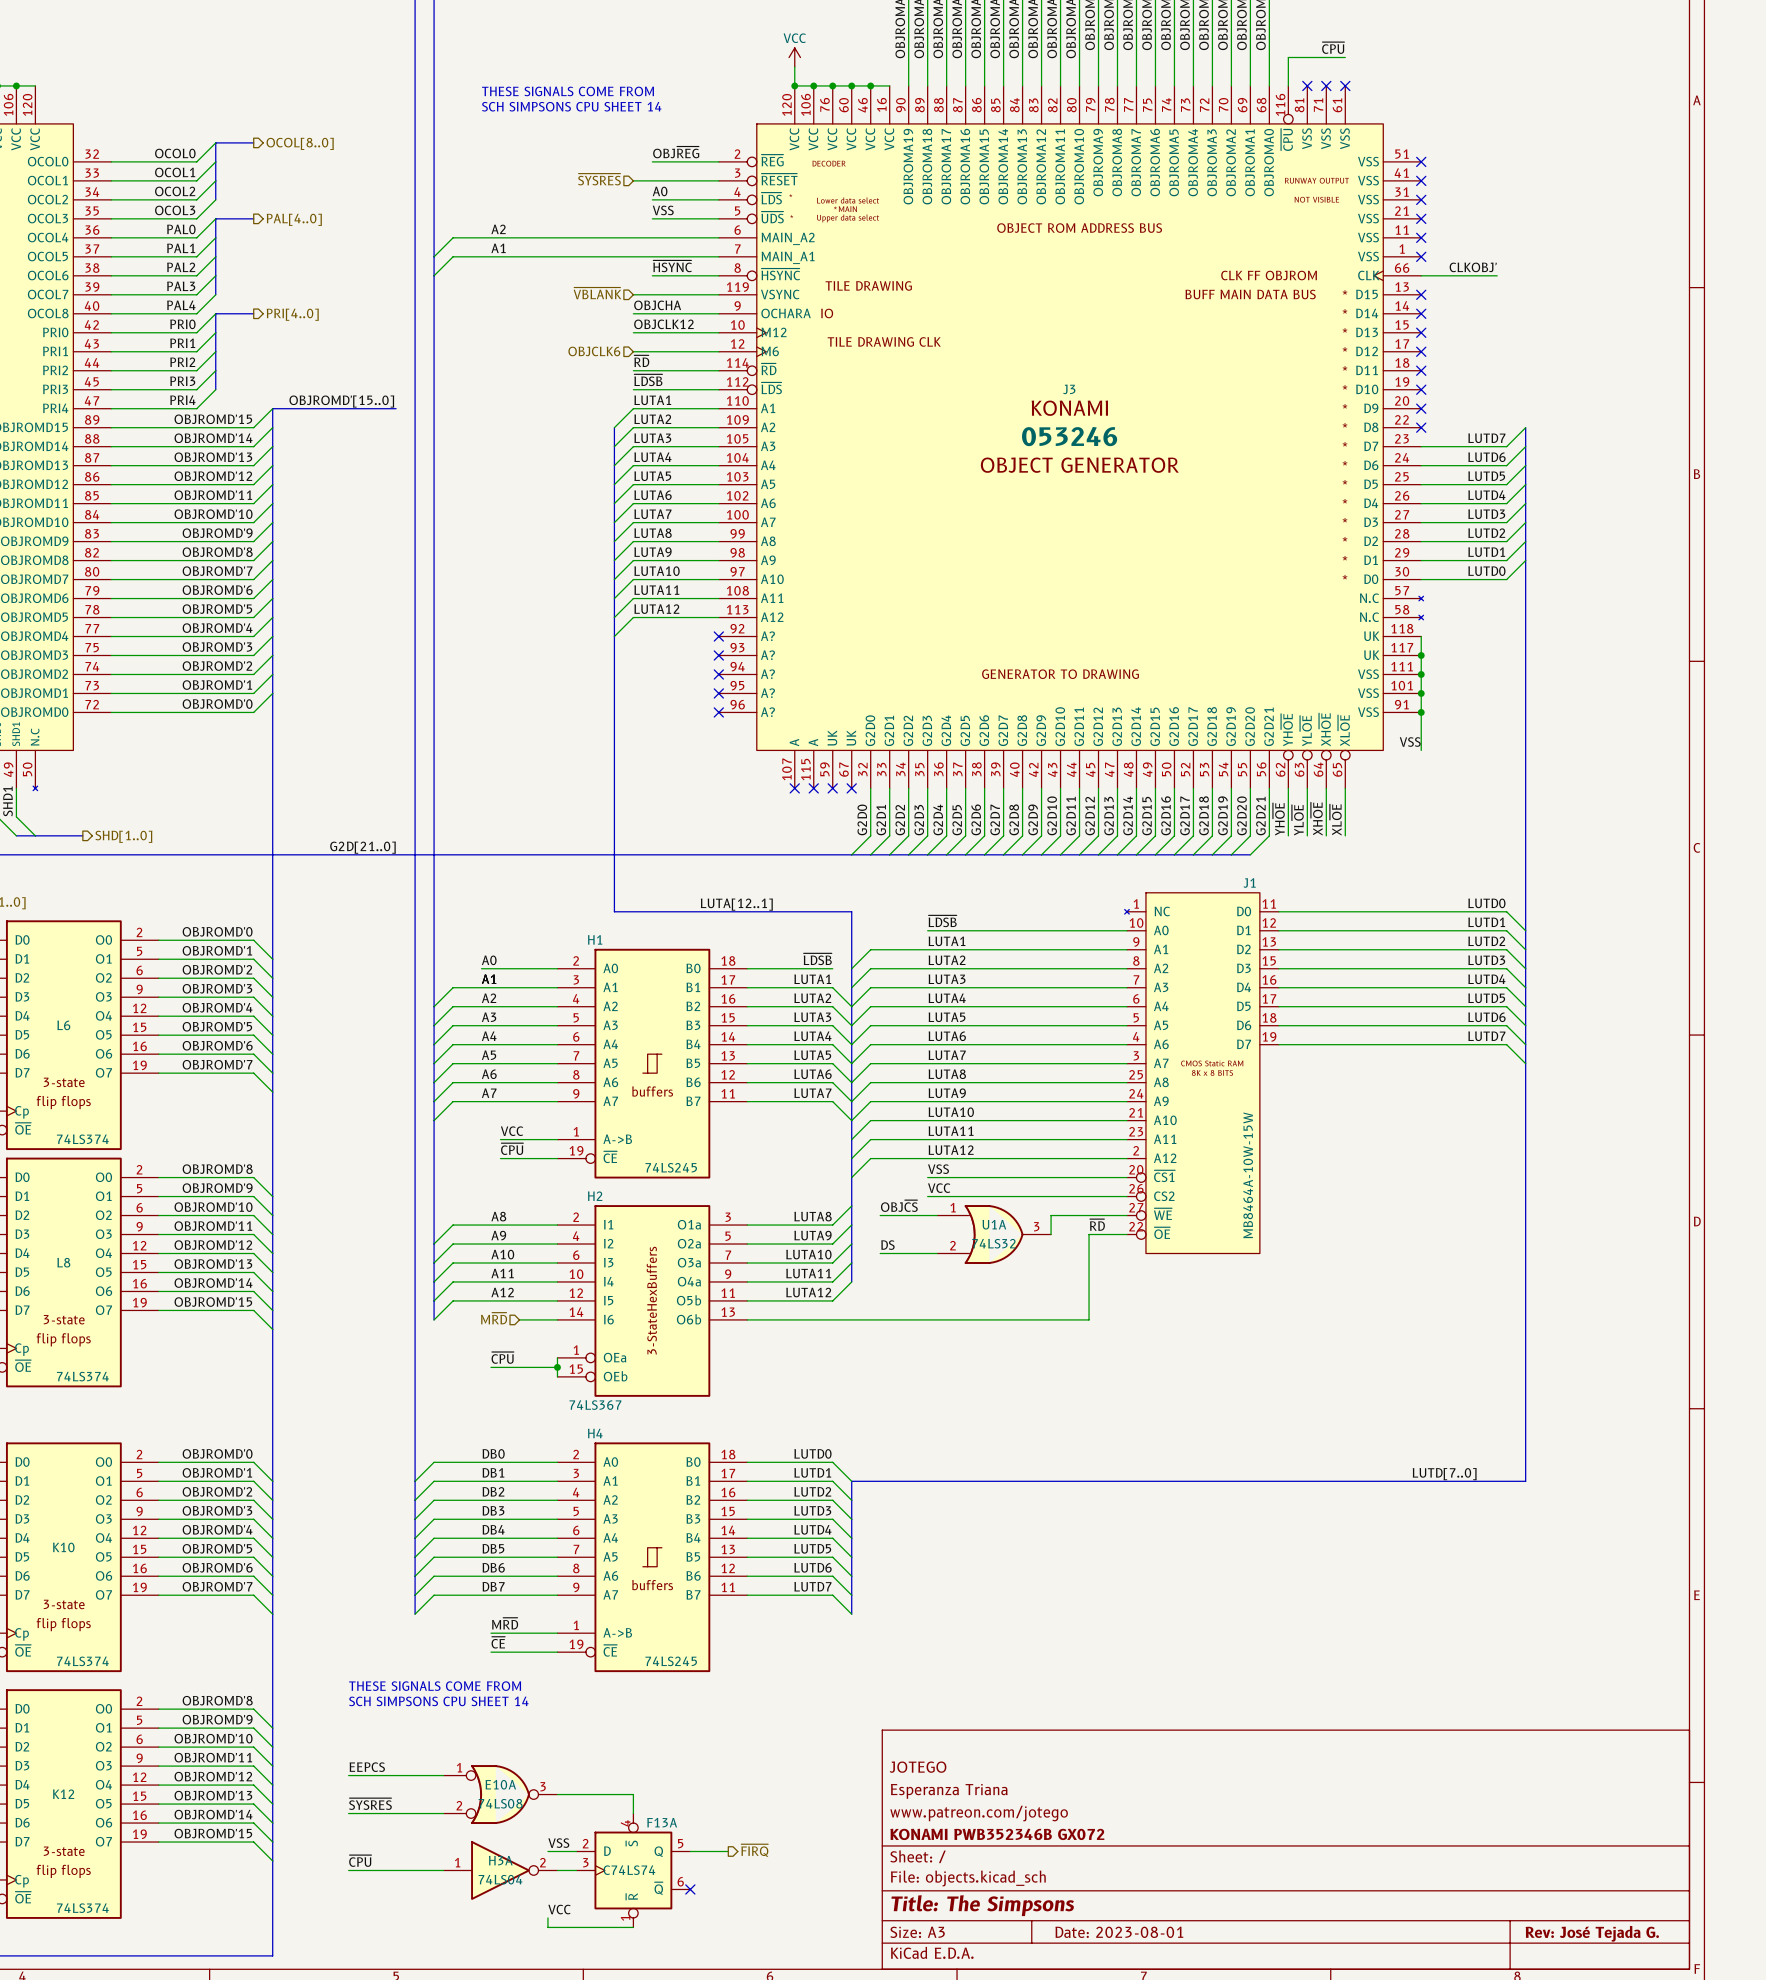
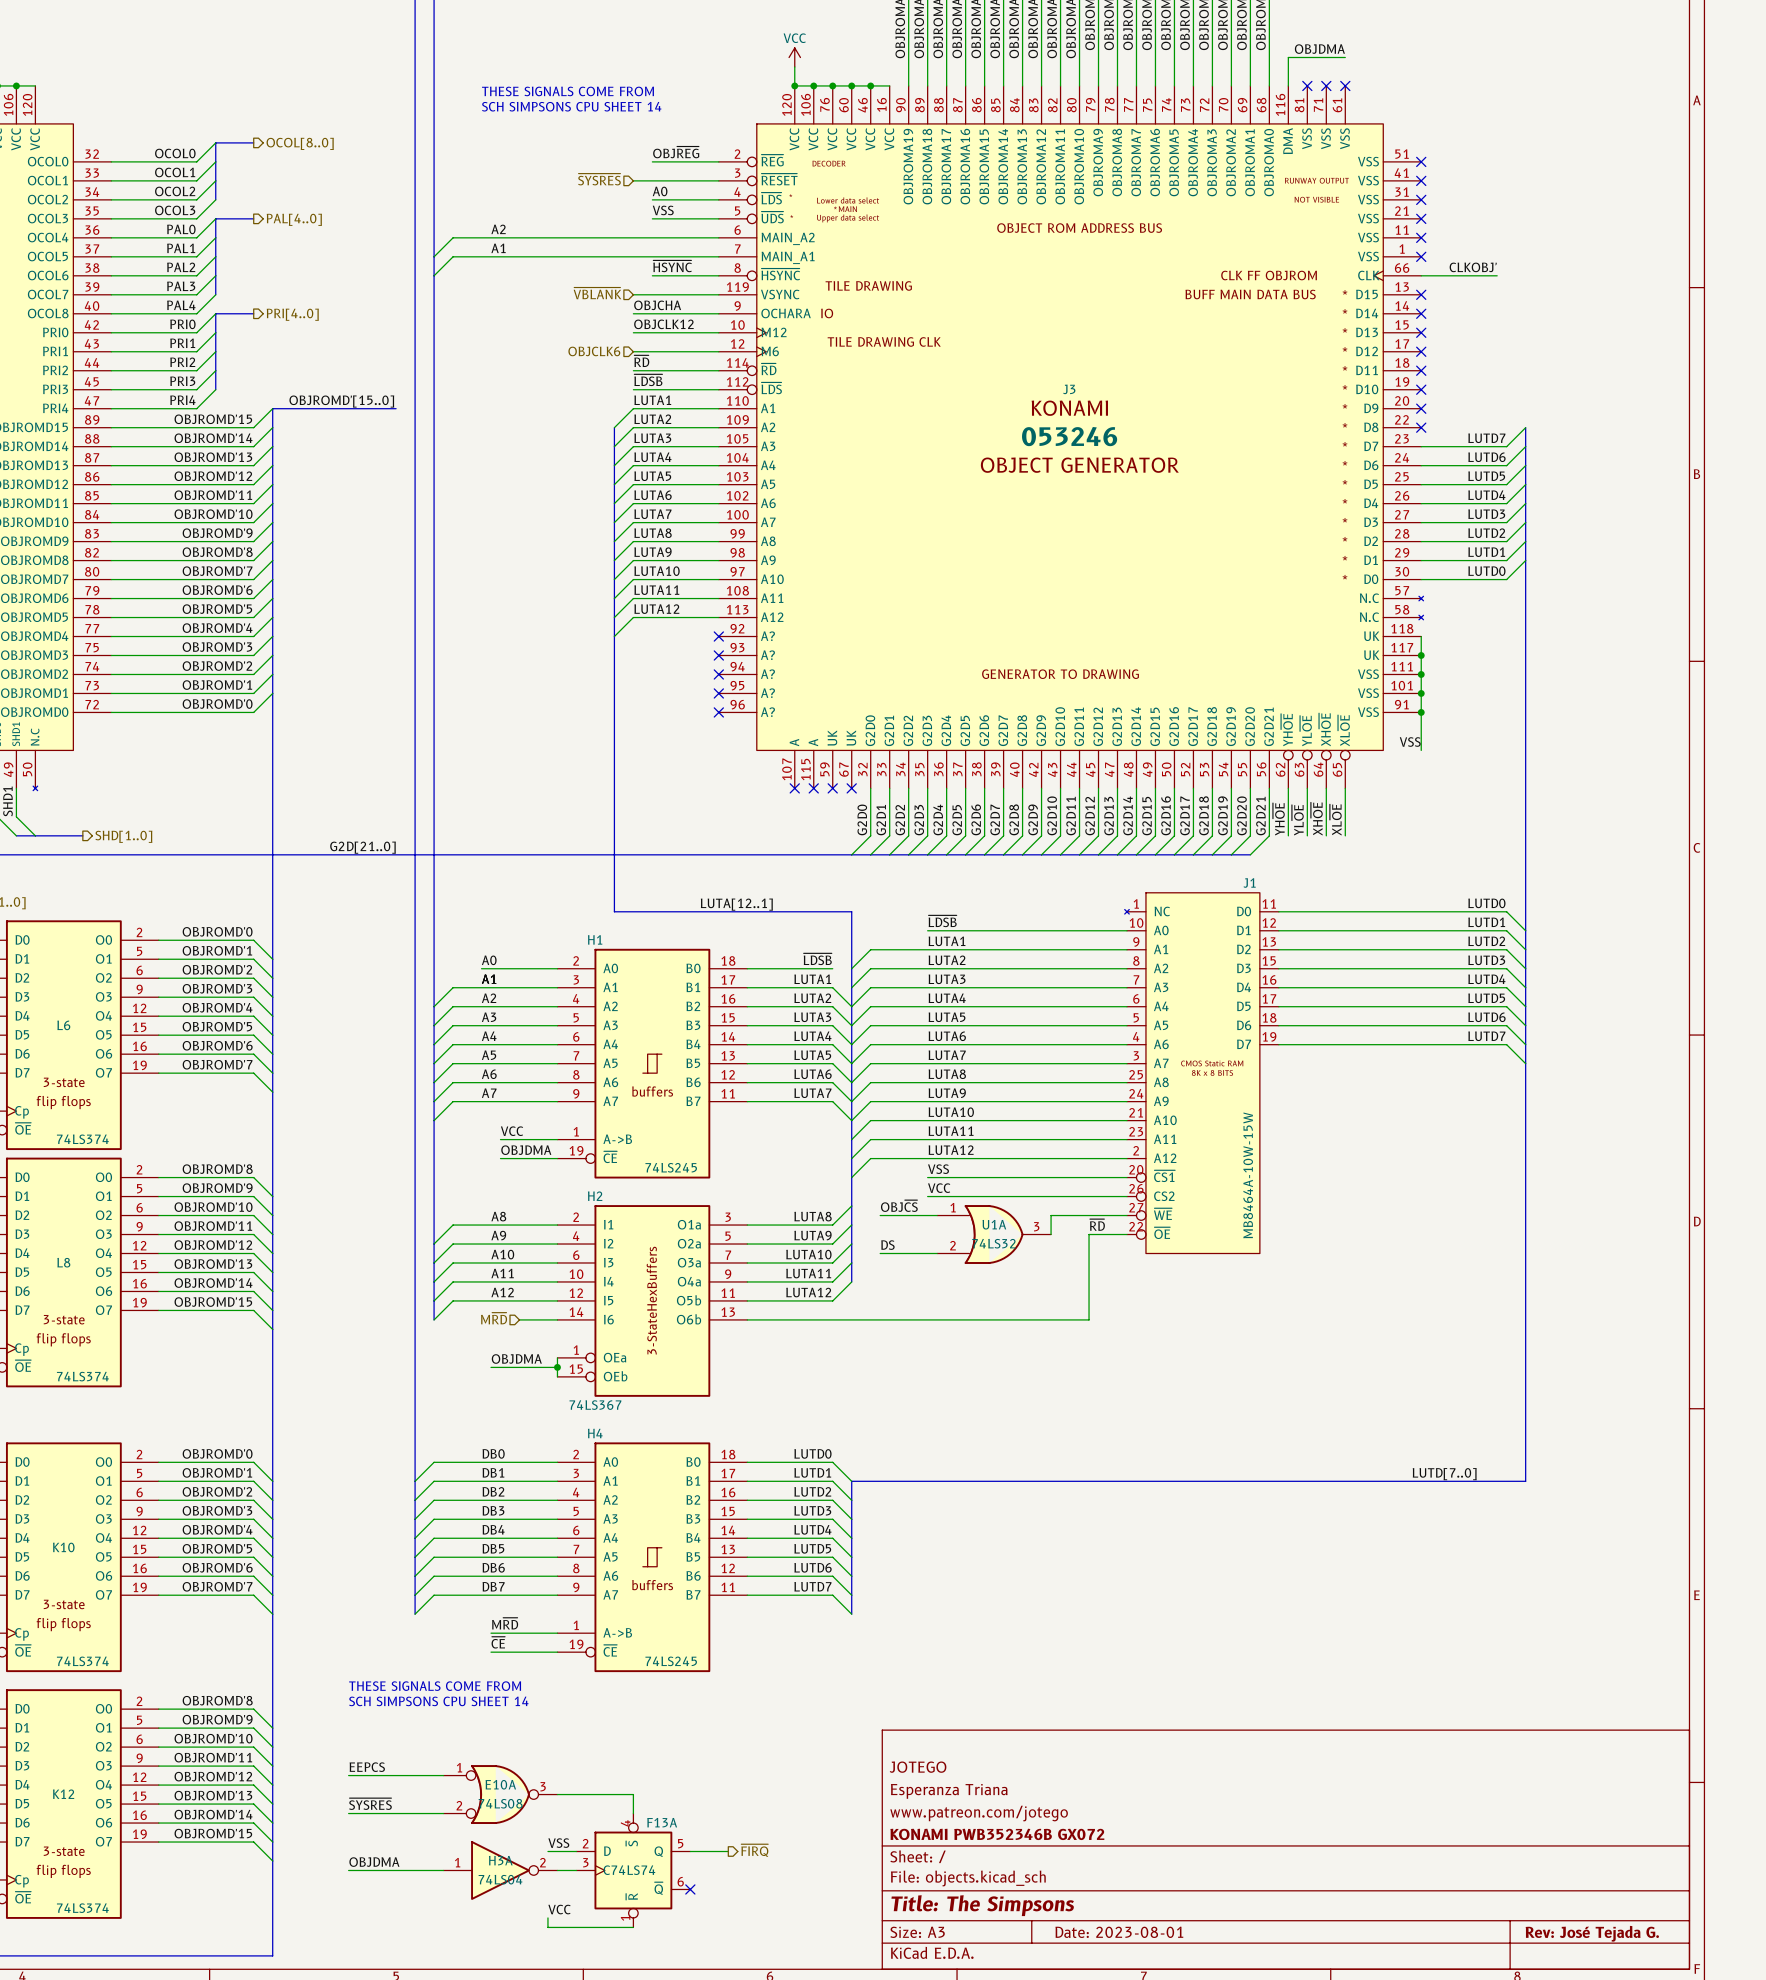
label: ~{CPU} (1333, 47) -> OBJDMA (1319, 49)
J3 symbol: [718, 85, 1424, 789] -> [718, 85, 1424, 789]
label: ~{CPU} (512, 1149) -> OBJDMA (526, 1150)
label: ~{CPU} (502, 1357) -> OBJDMA (516, 1358)
label: ~{CPU} (360, 1860) -> OBJDMA (374, 1862)

